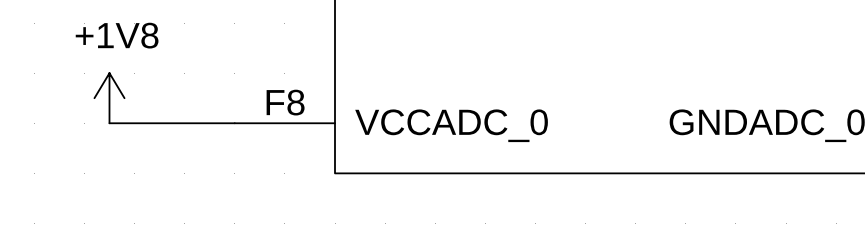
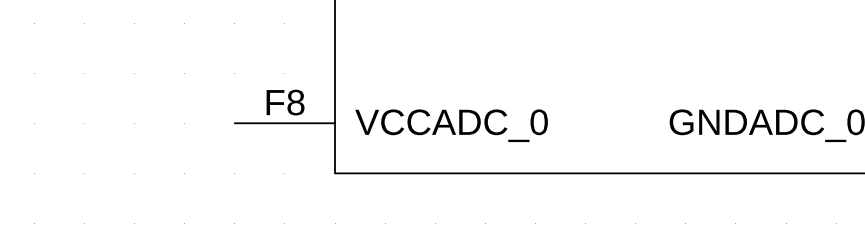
power symbol: +1V8 (109, 98) -> none
wire: (109, 123) (234, 123) -> none

